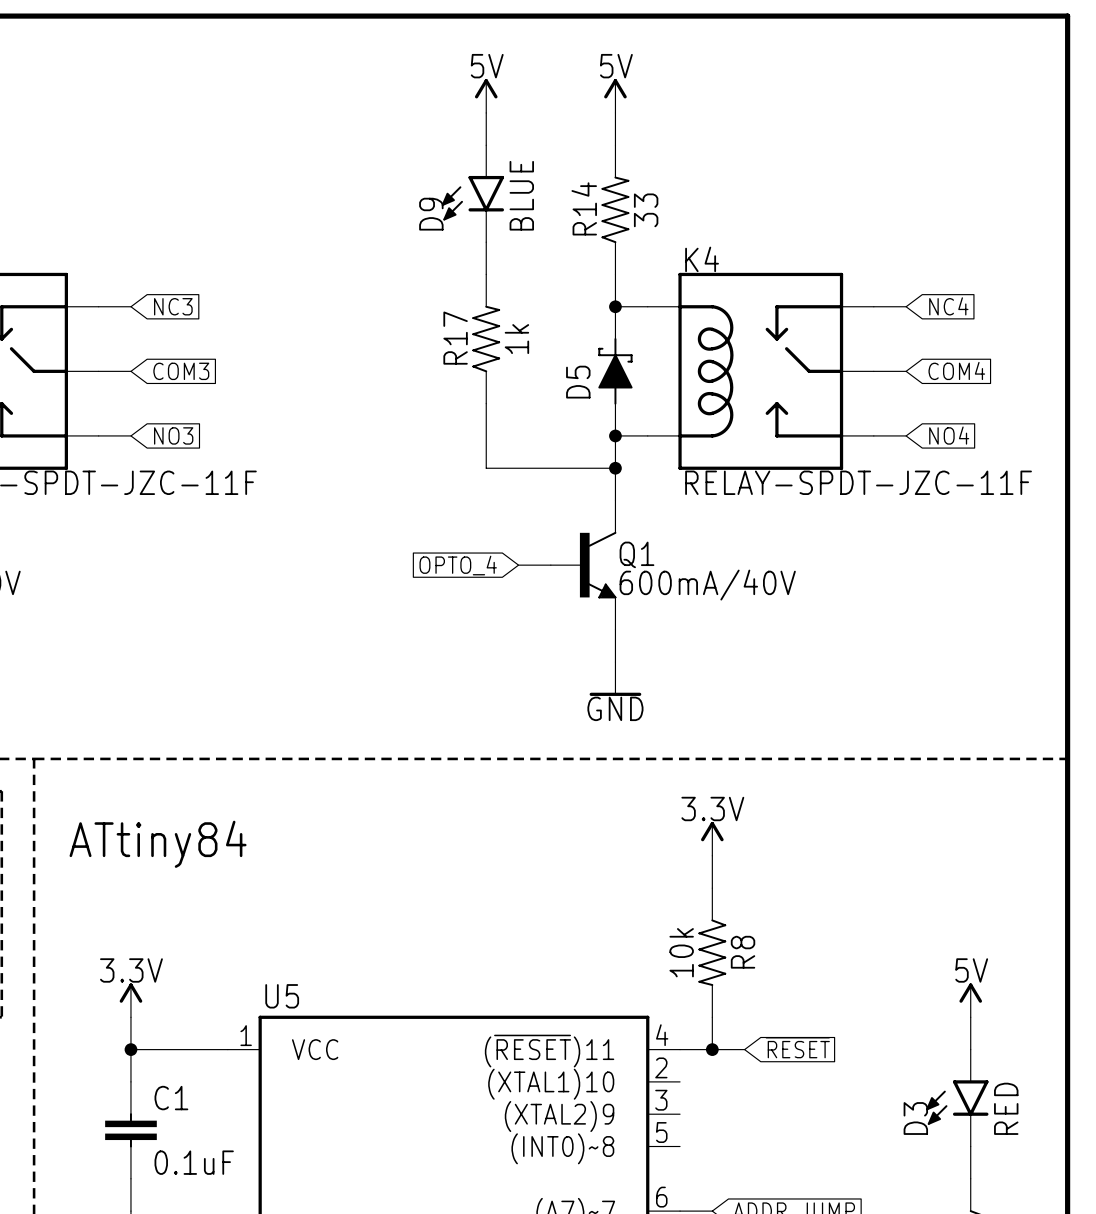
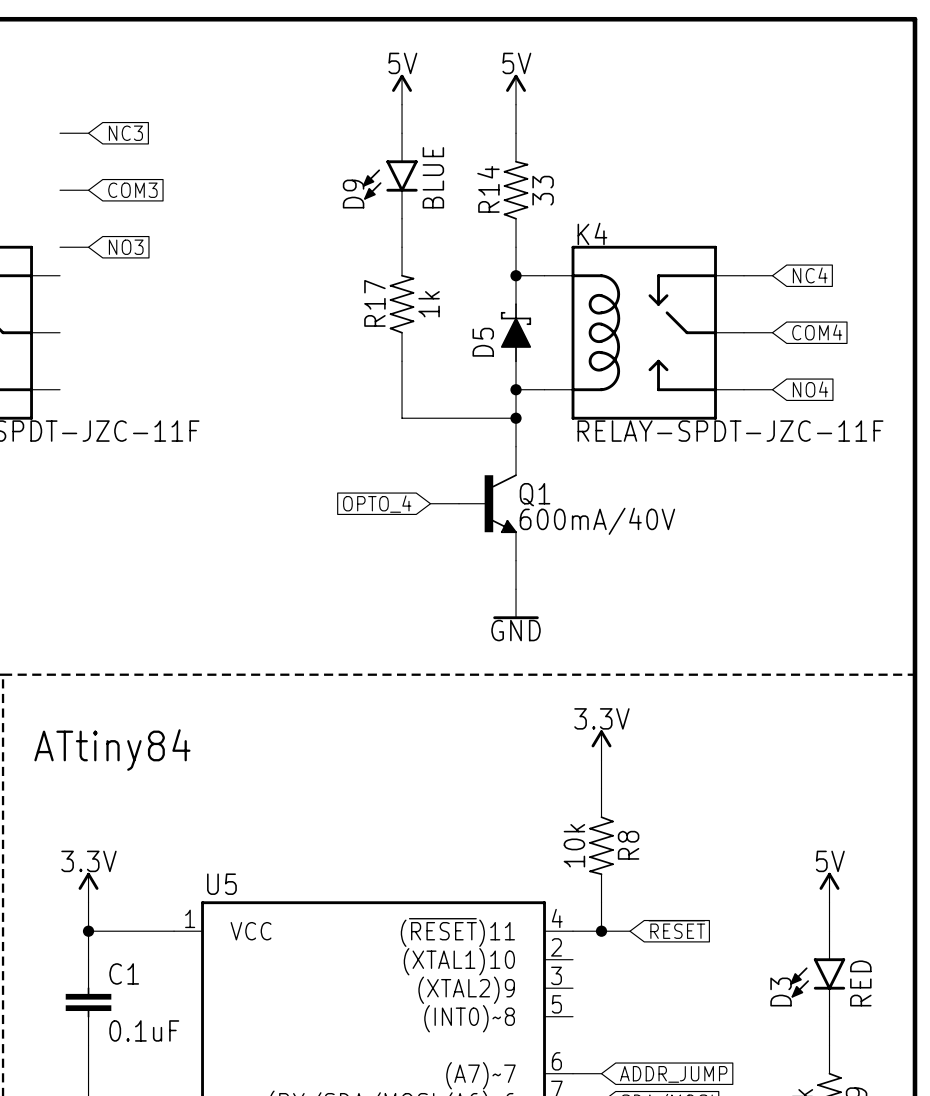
wire: (98, 306) (130, 306) -> (60, 133) (88, 133)
global label position: NC3 (173, 306) -> NC3 (125, 133)
wire: (98, 371) (130, 371) -> (60, 190) (88, 190)
global label position: COM3 (181, 371) -> COM3 (132, 190)
wire: (98, 435) (130, 435) -> (60, 247) (88, 247)
global label position: NO3 (173, 435) -> NO3 (126, 247)

